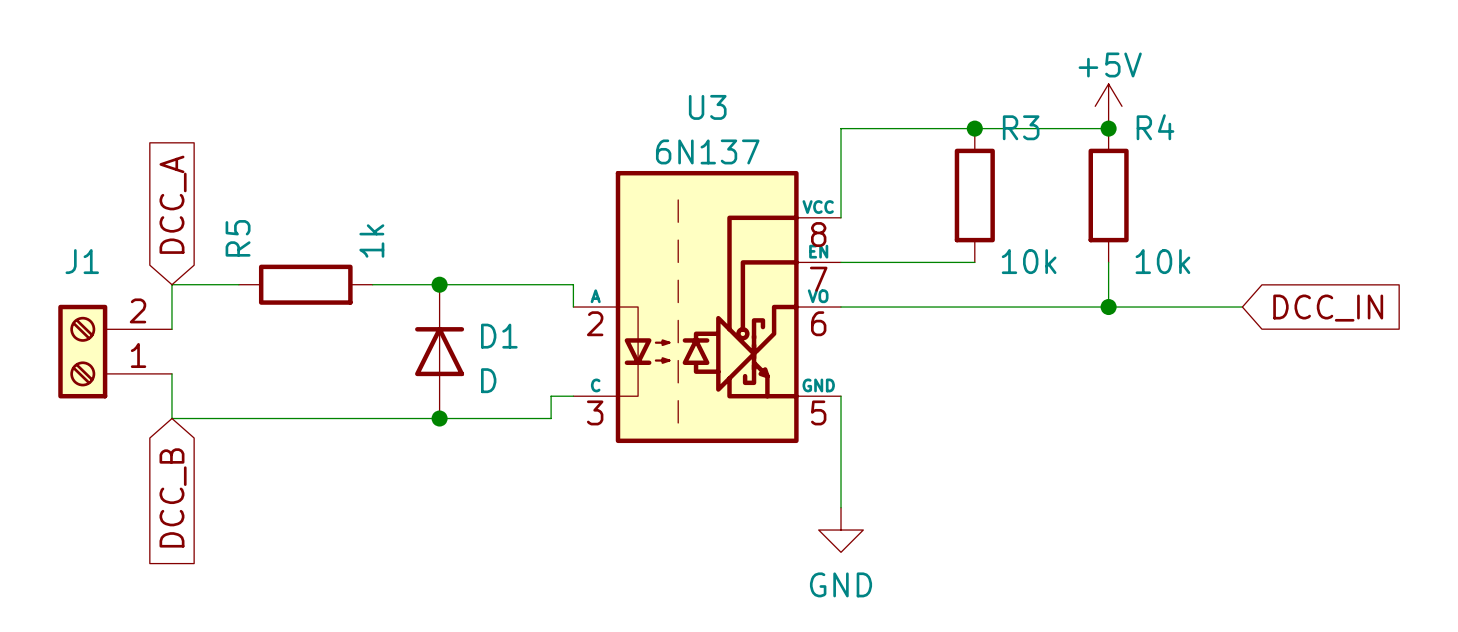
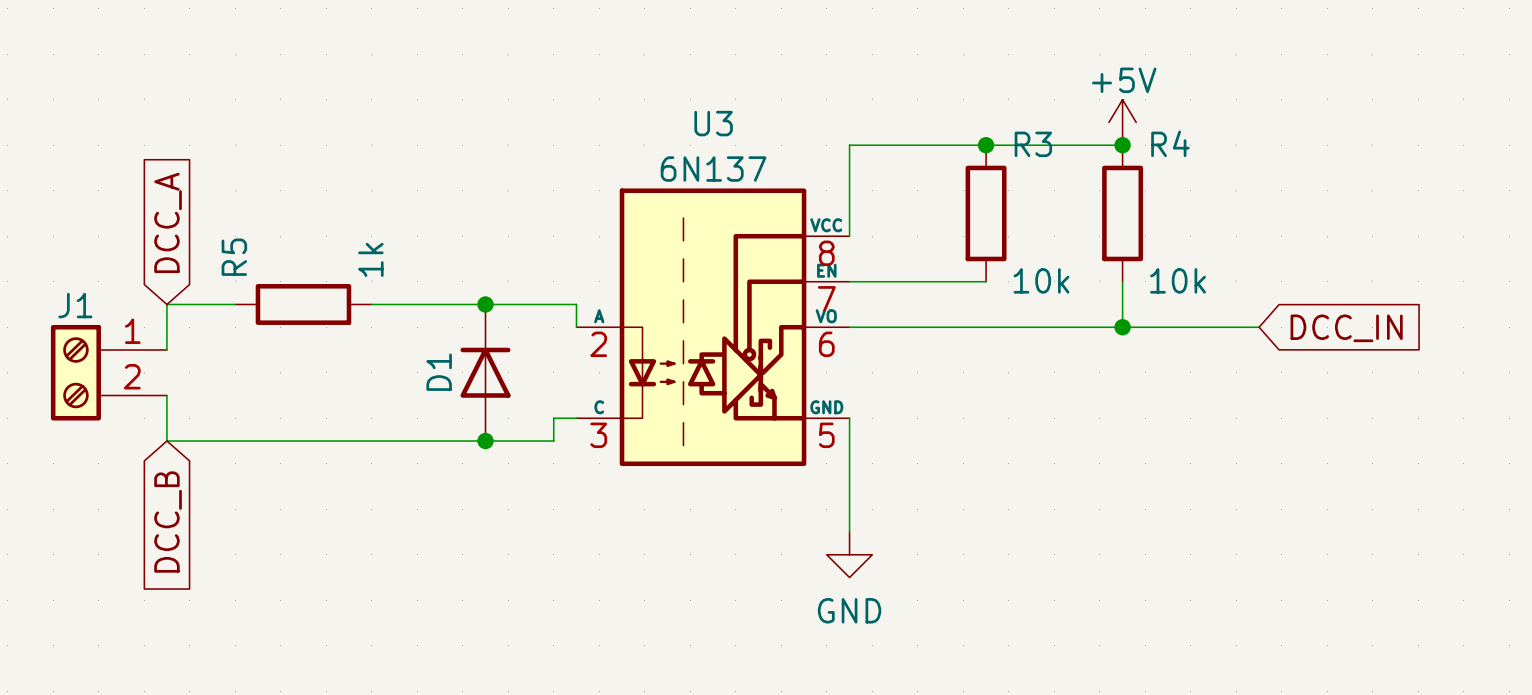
junction position: (439, 284) -> (485, 304)
D1 name rotation: 0° (499, 336) -> 90° counterclockwise (439, 372)
D1 name position: D1 (499, 336) -> D1 (439, 372)
J1 flip: as is (82, 351) -> up-down (75, 372)
D1 position: (439, 351) -> (485, 372)
D1 value: D (488, 380) -> none
junction position: (439, 418) -> (485, 441)

